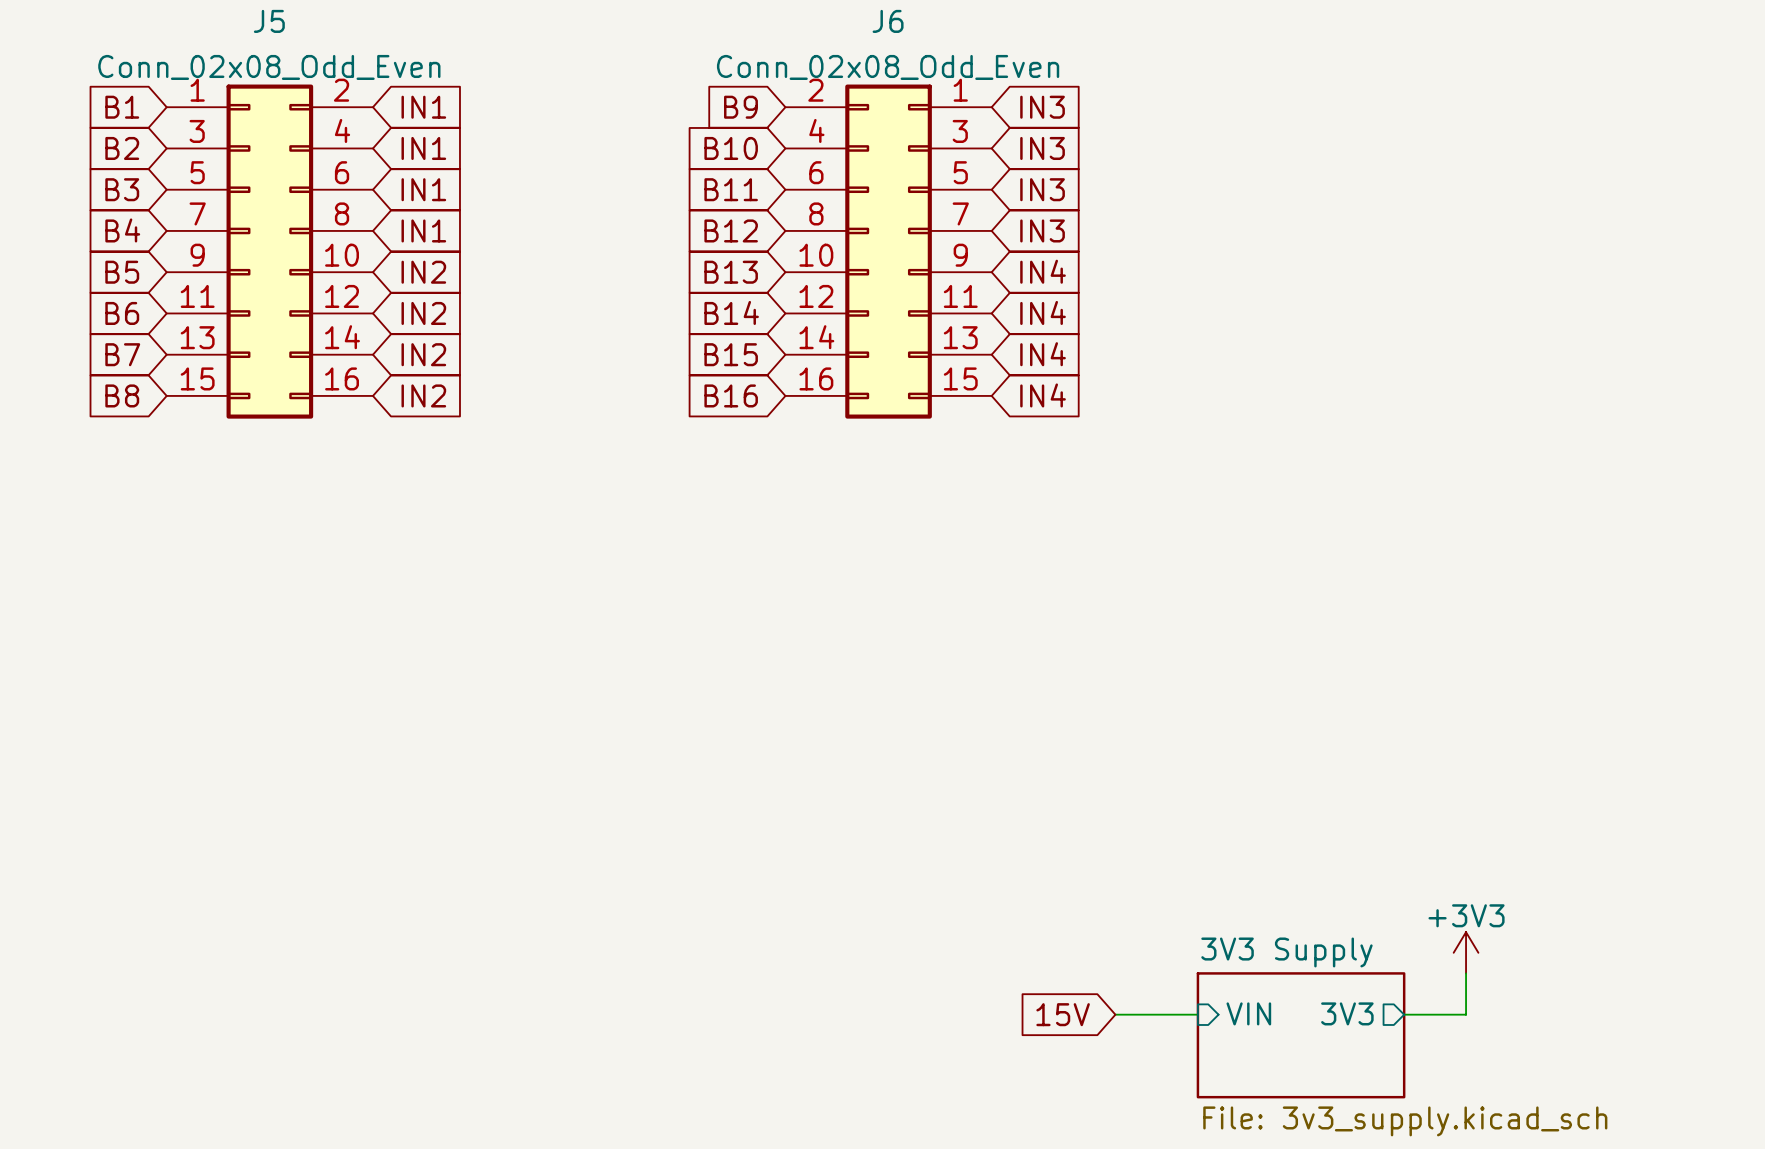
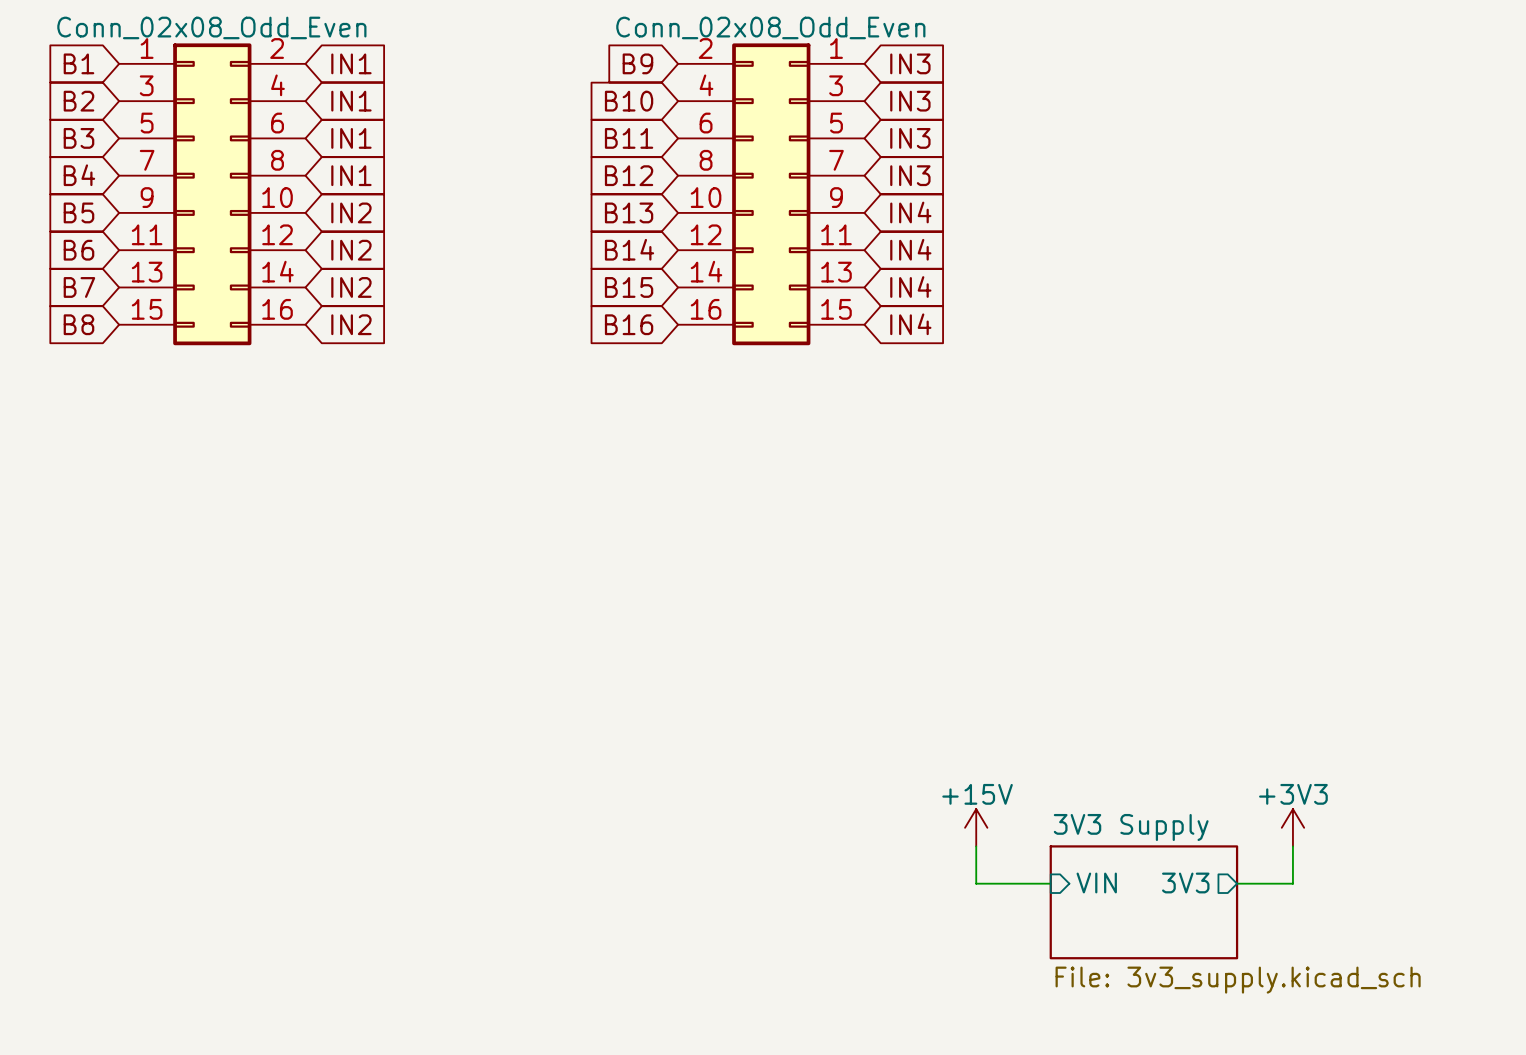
power symbol: none -> +15V (976, 827)
wire: none -> (976, 846) (976, 883)
global label: 15V (1063, 1014) -> none

